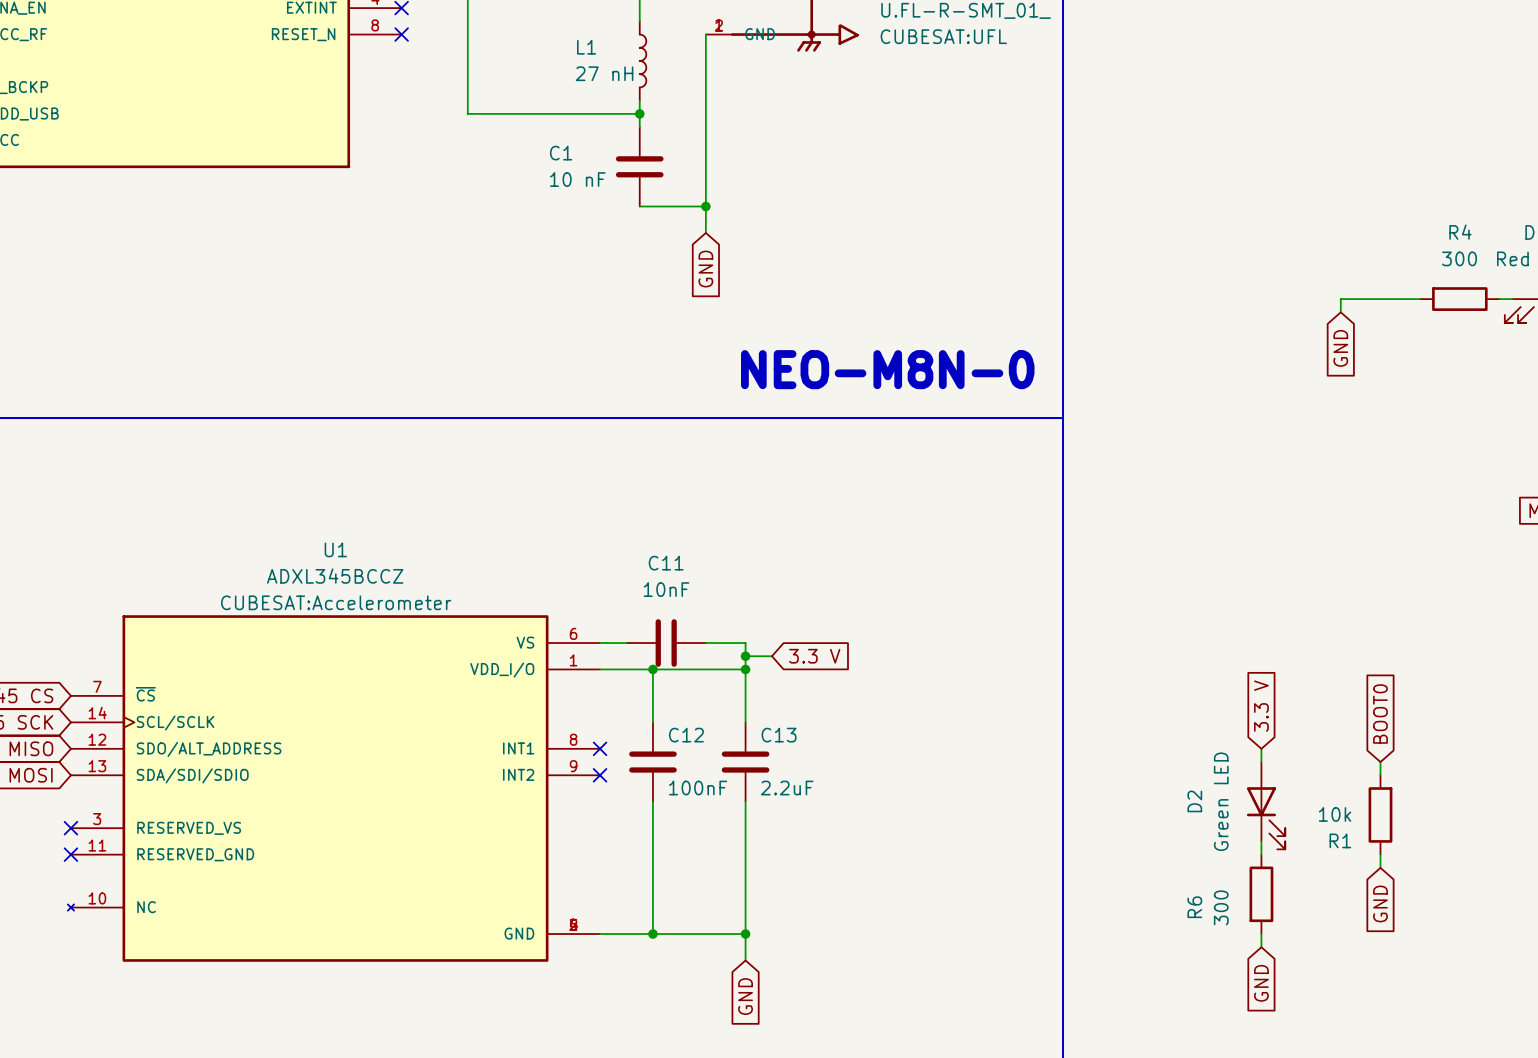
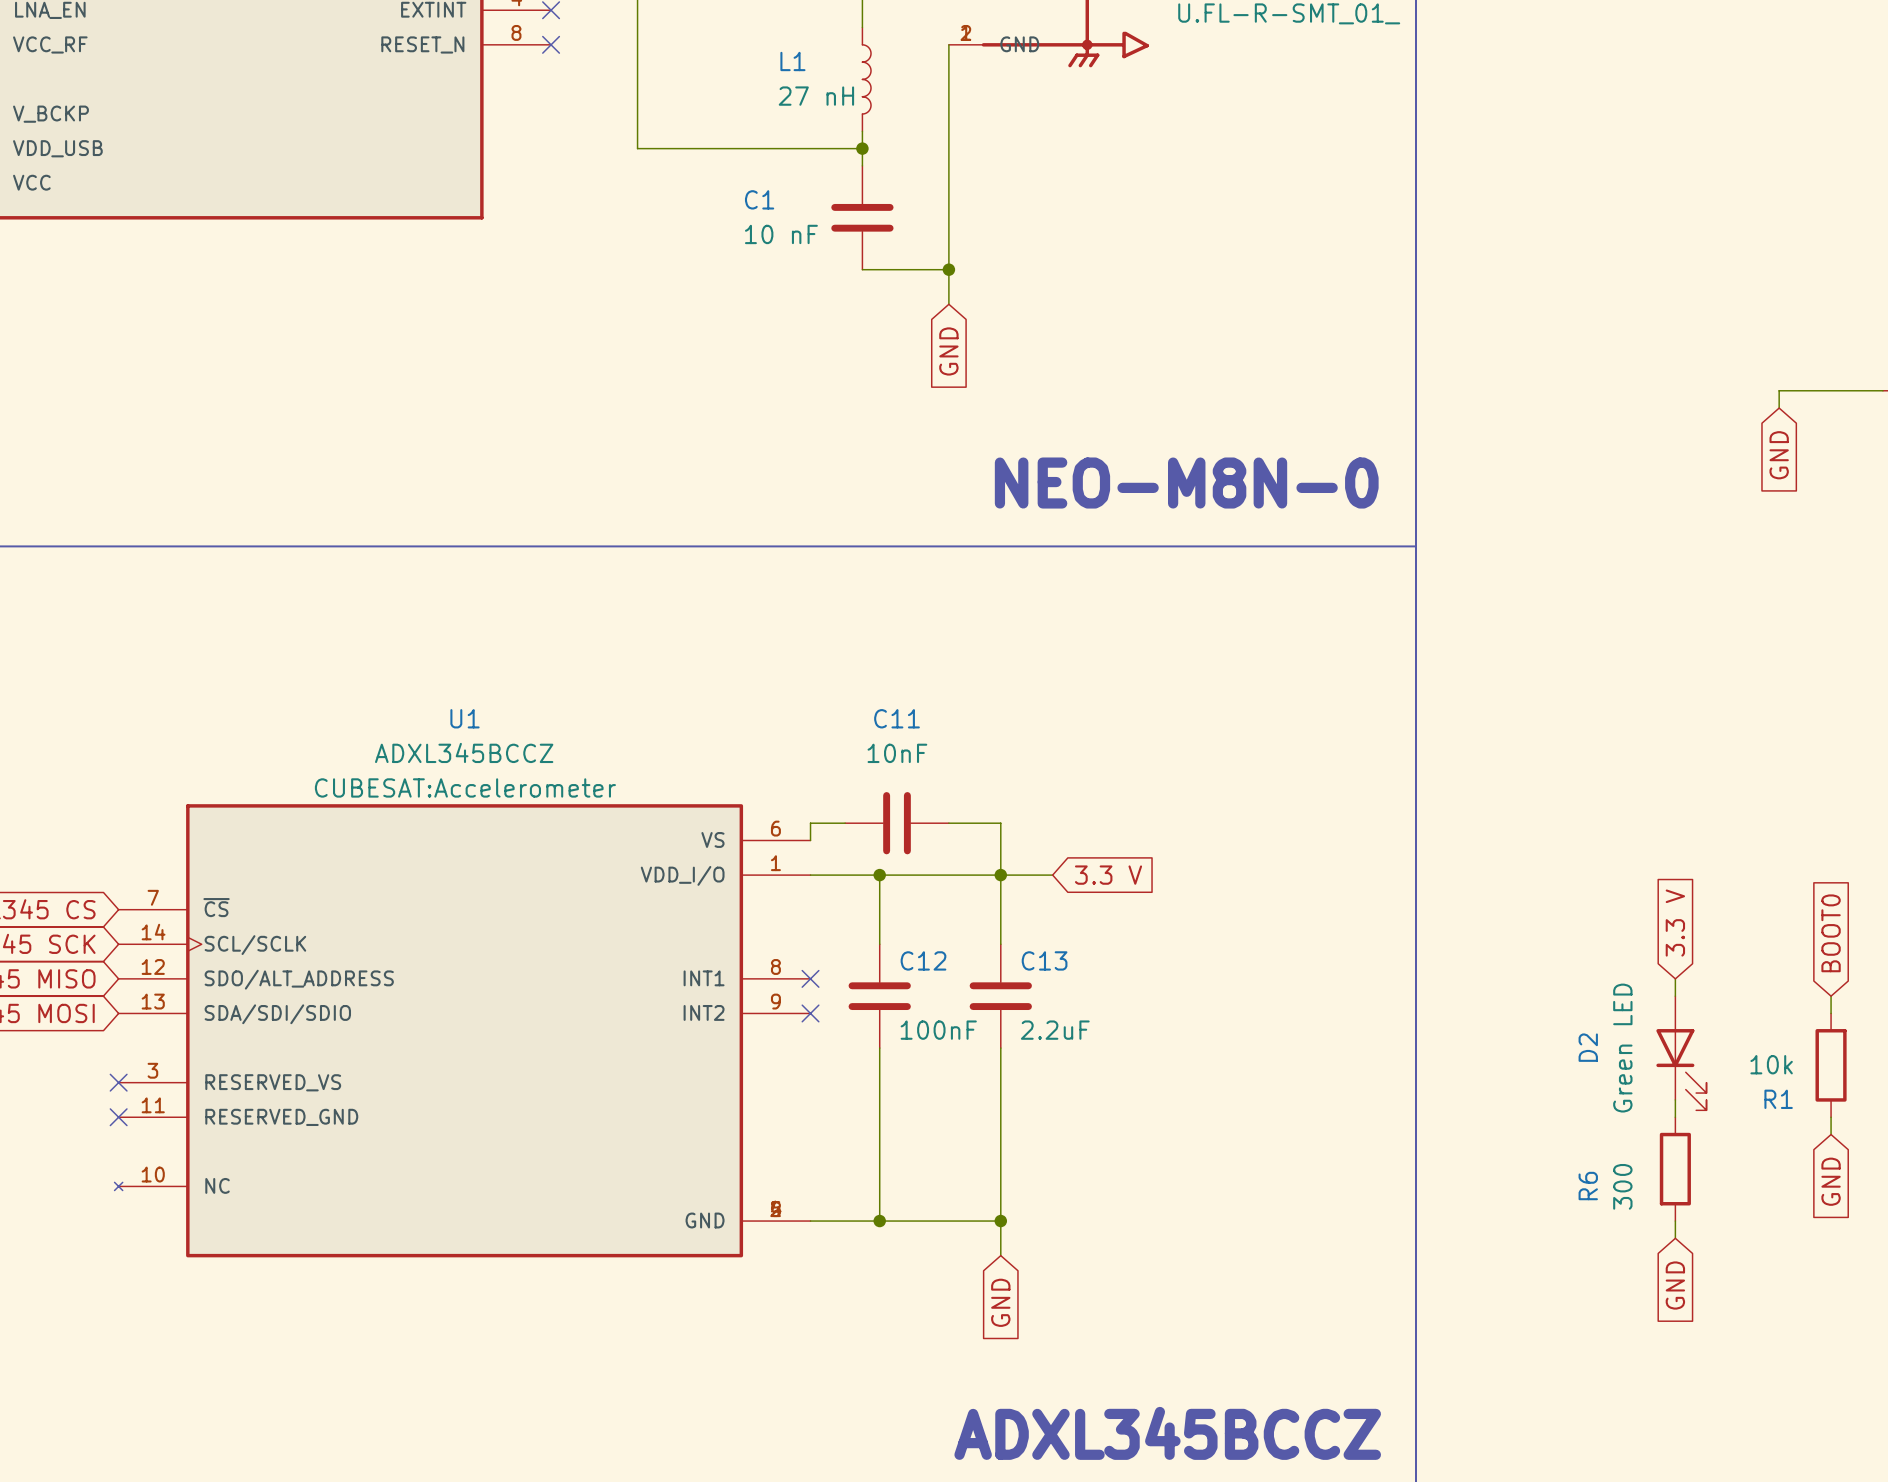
part text: CUBESAT:UFL (943, 36) -> none
wire: (600, 643) (626, 643) -> (810, 840) (810, 823) (845, 823)
C11 position: (666, 643) -> (897, 823)
wire: (705, 643) (745, 643) -> (948, 823) (1000, 823) (1000, 840)
wire: (745, 656) (772, 656) -> none
junction: (745, 656) -> none
global label position: 3.3 V (814, 656) -> 3.3 V (1108, 875)
wire: none -> (1000, 875) (1052, 875)

